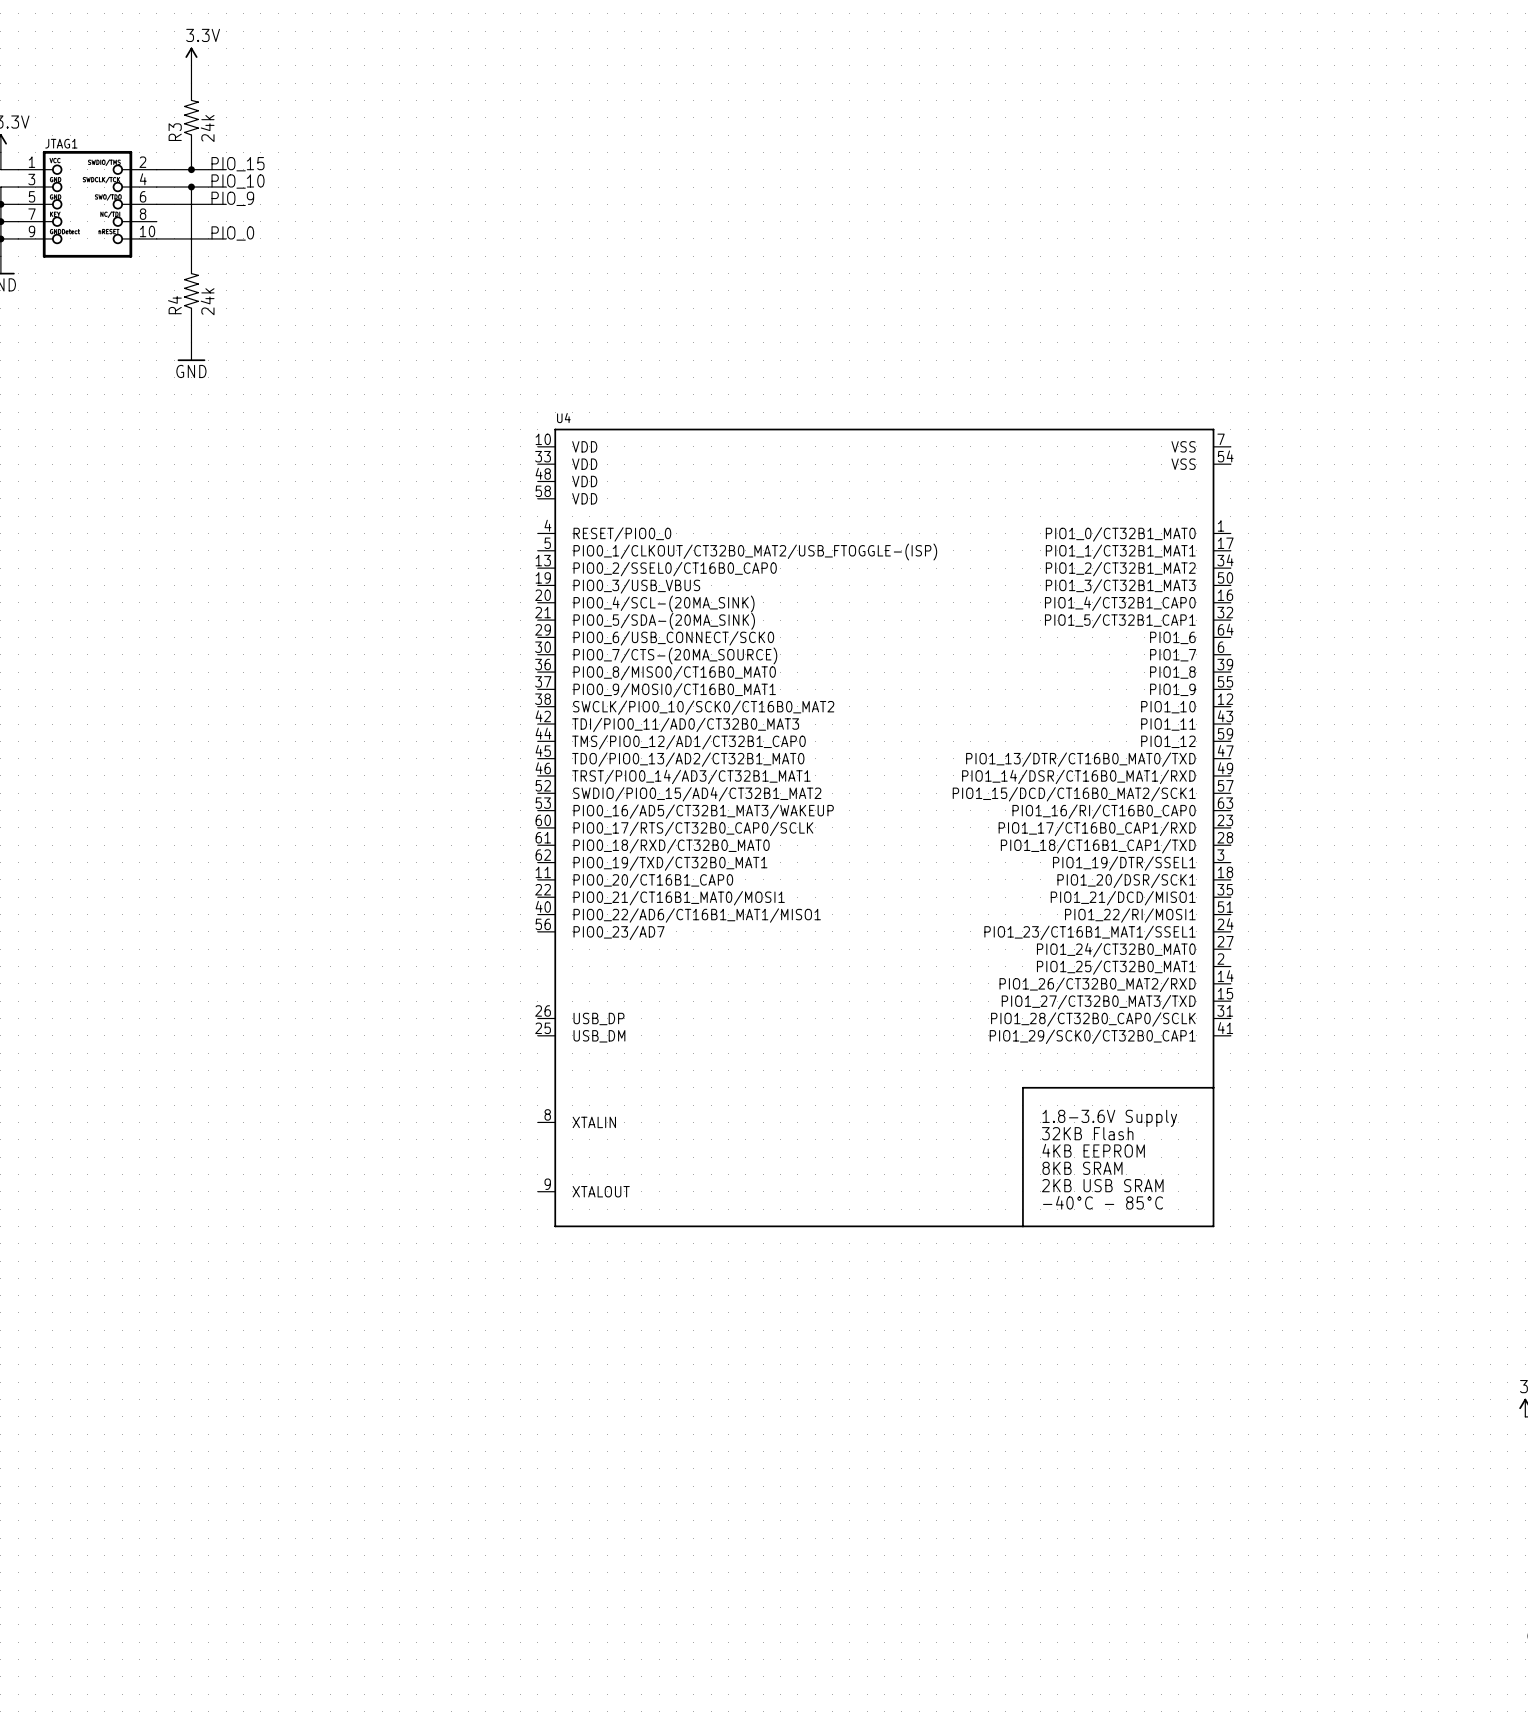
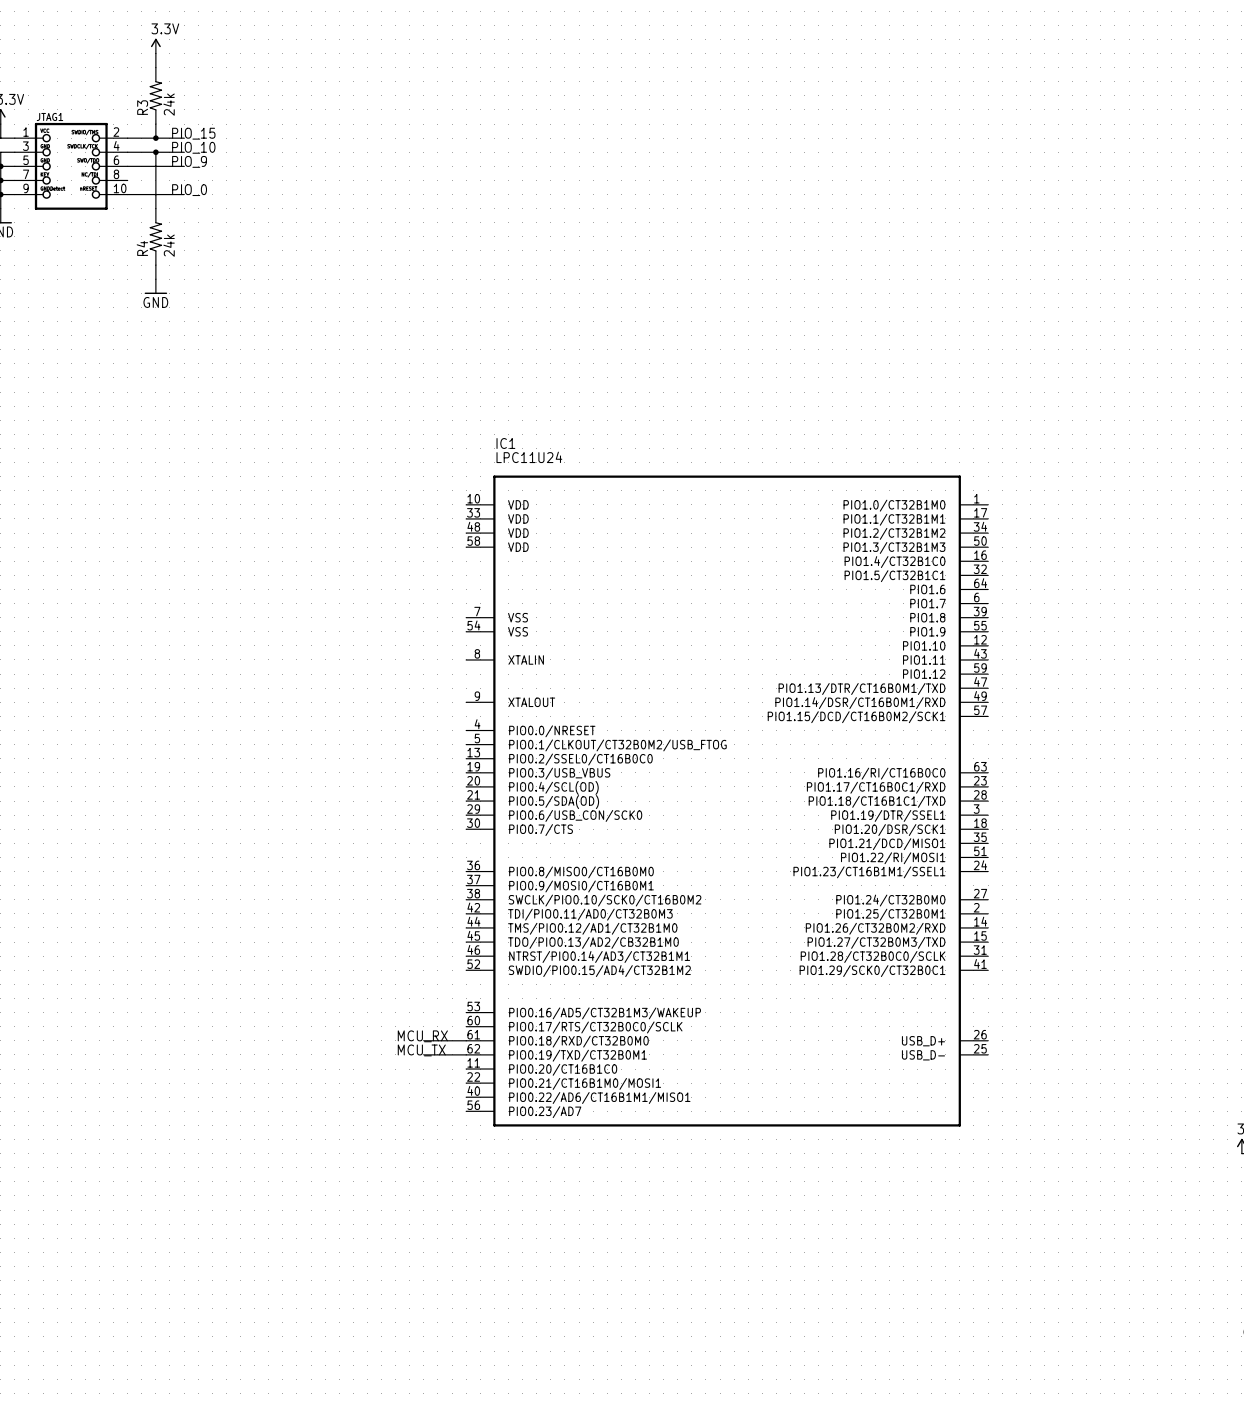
U4: (884, 827) -> none
IC1: none -> (727, 801)
label: none -> MCU_RX (422, 1036)
wire: none -> (423, 1040) (466, 1040)
label: none -> MCU_TX (421, 1050)
wire: none -> (423, 1054) (466, 1054)

